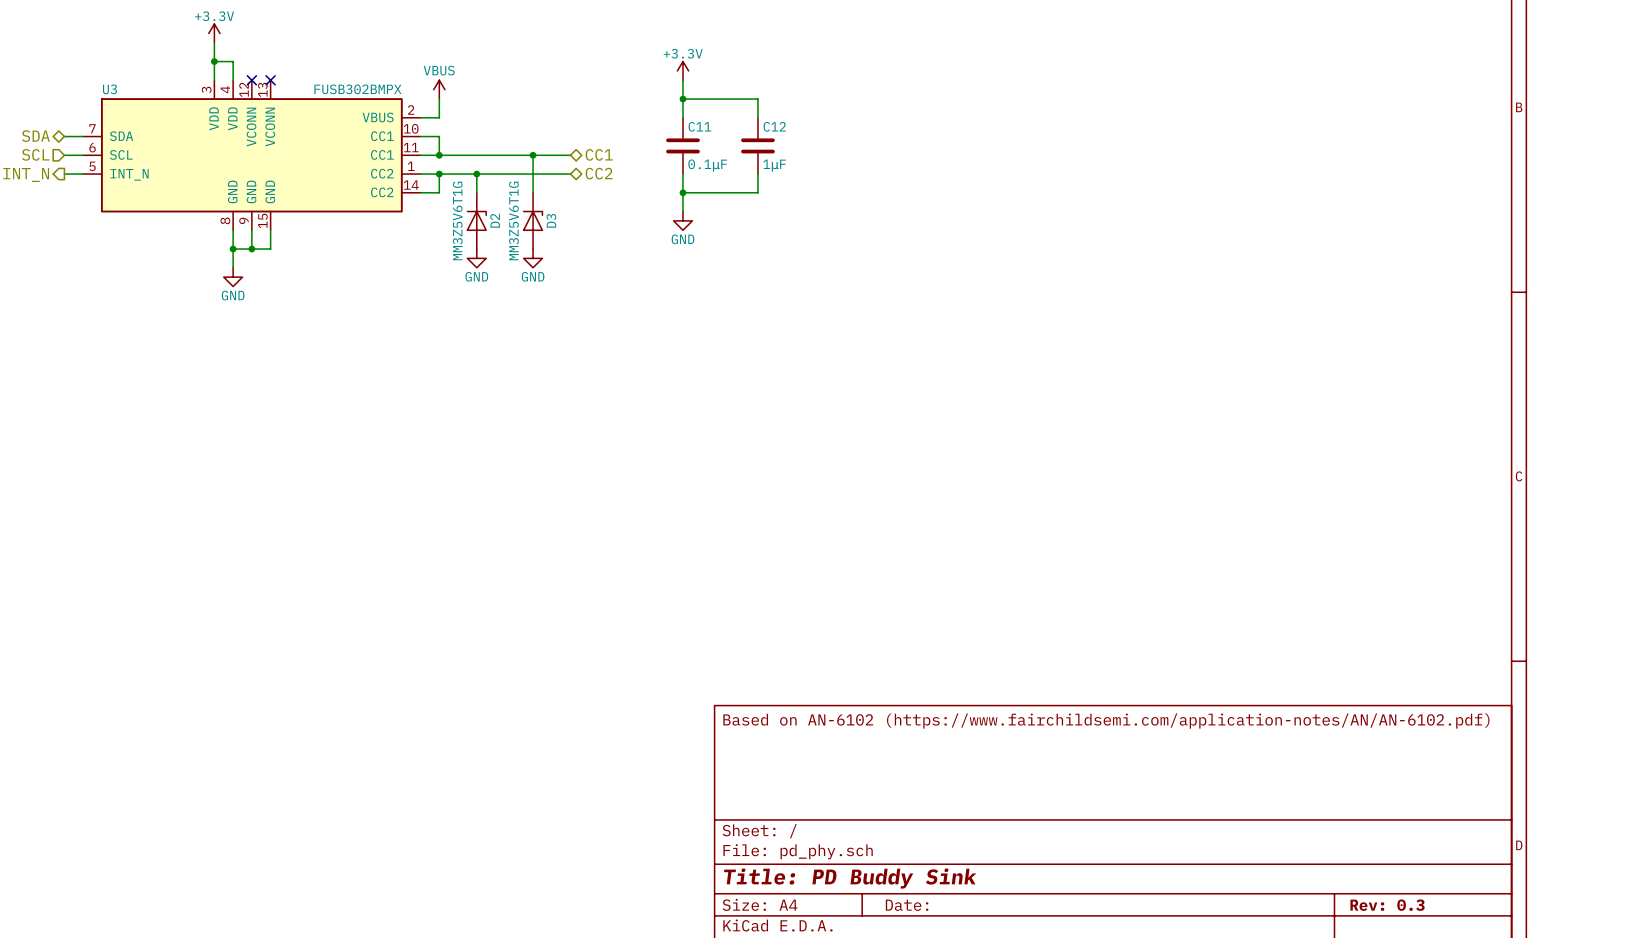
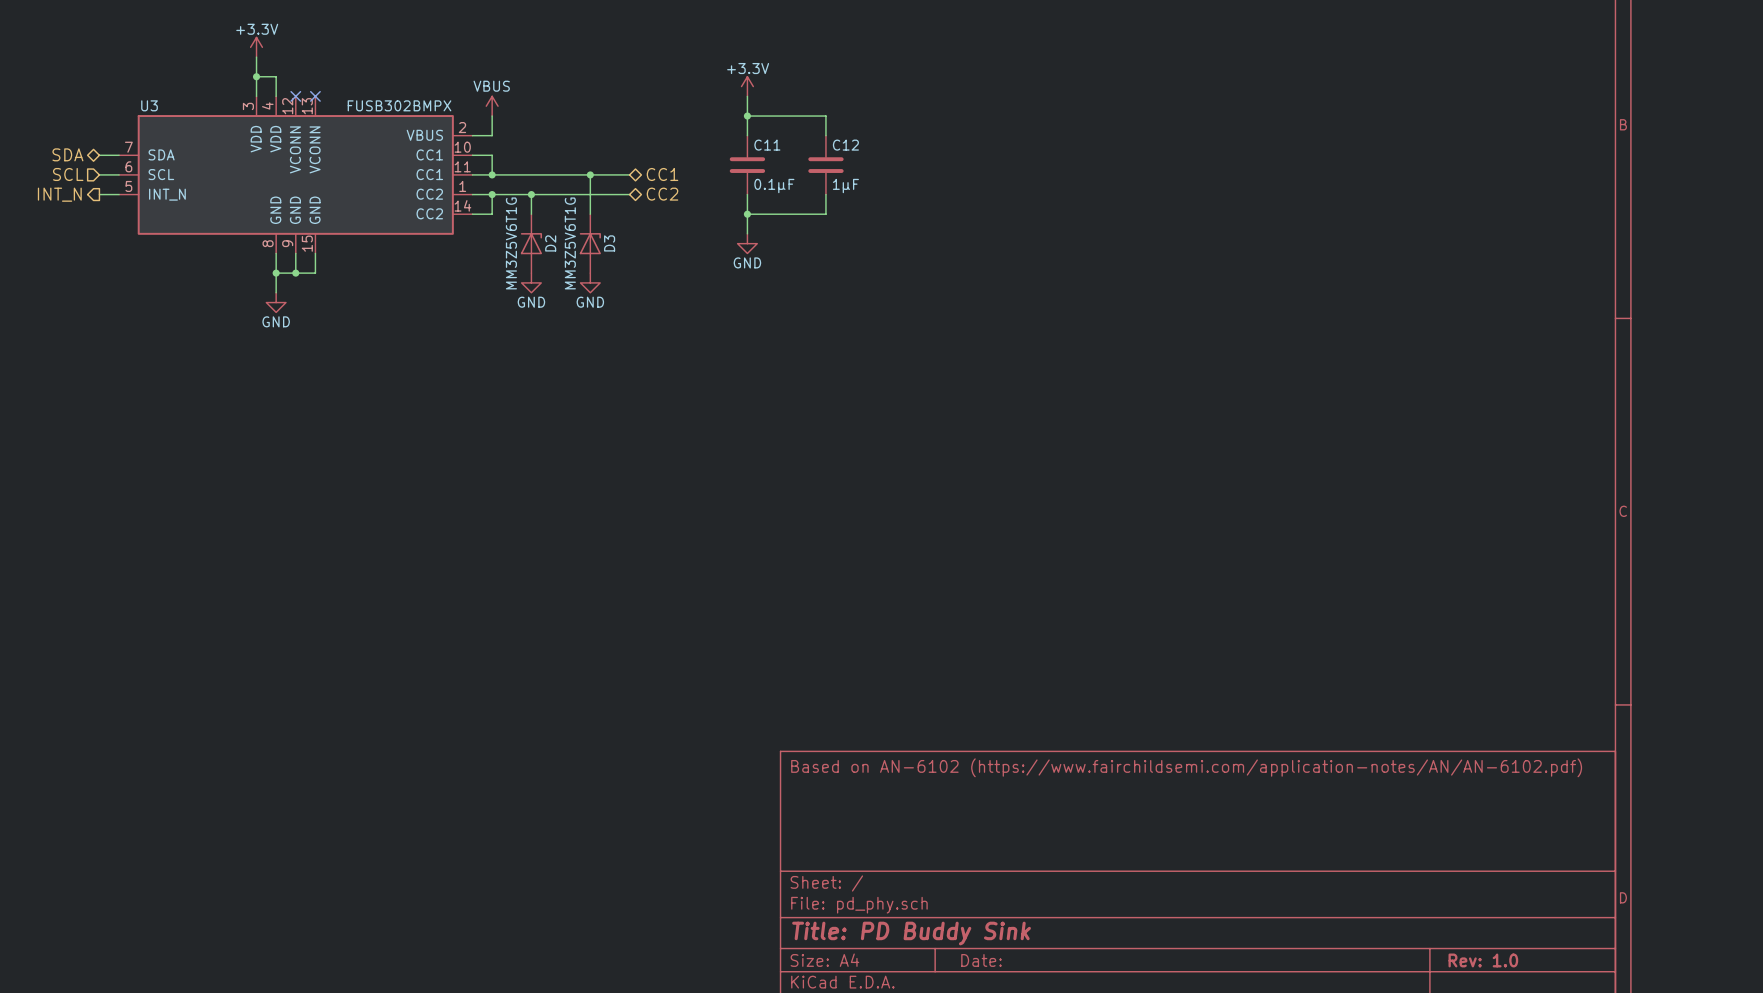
title block: Rev: 0.3 (1387, 905) -> Rev: 1.0 (1483, 960)

